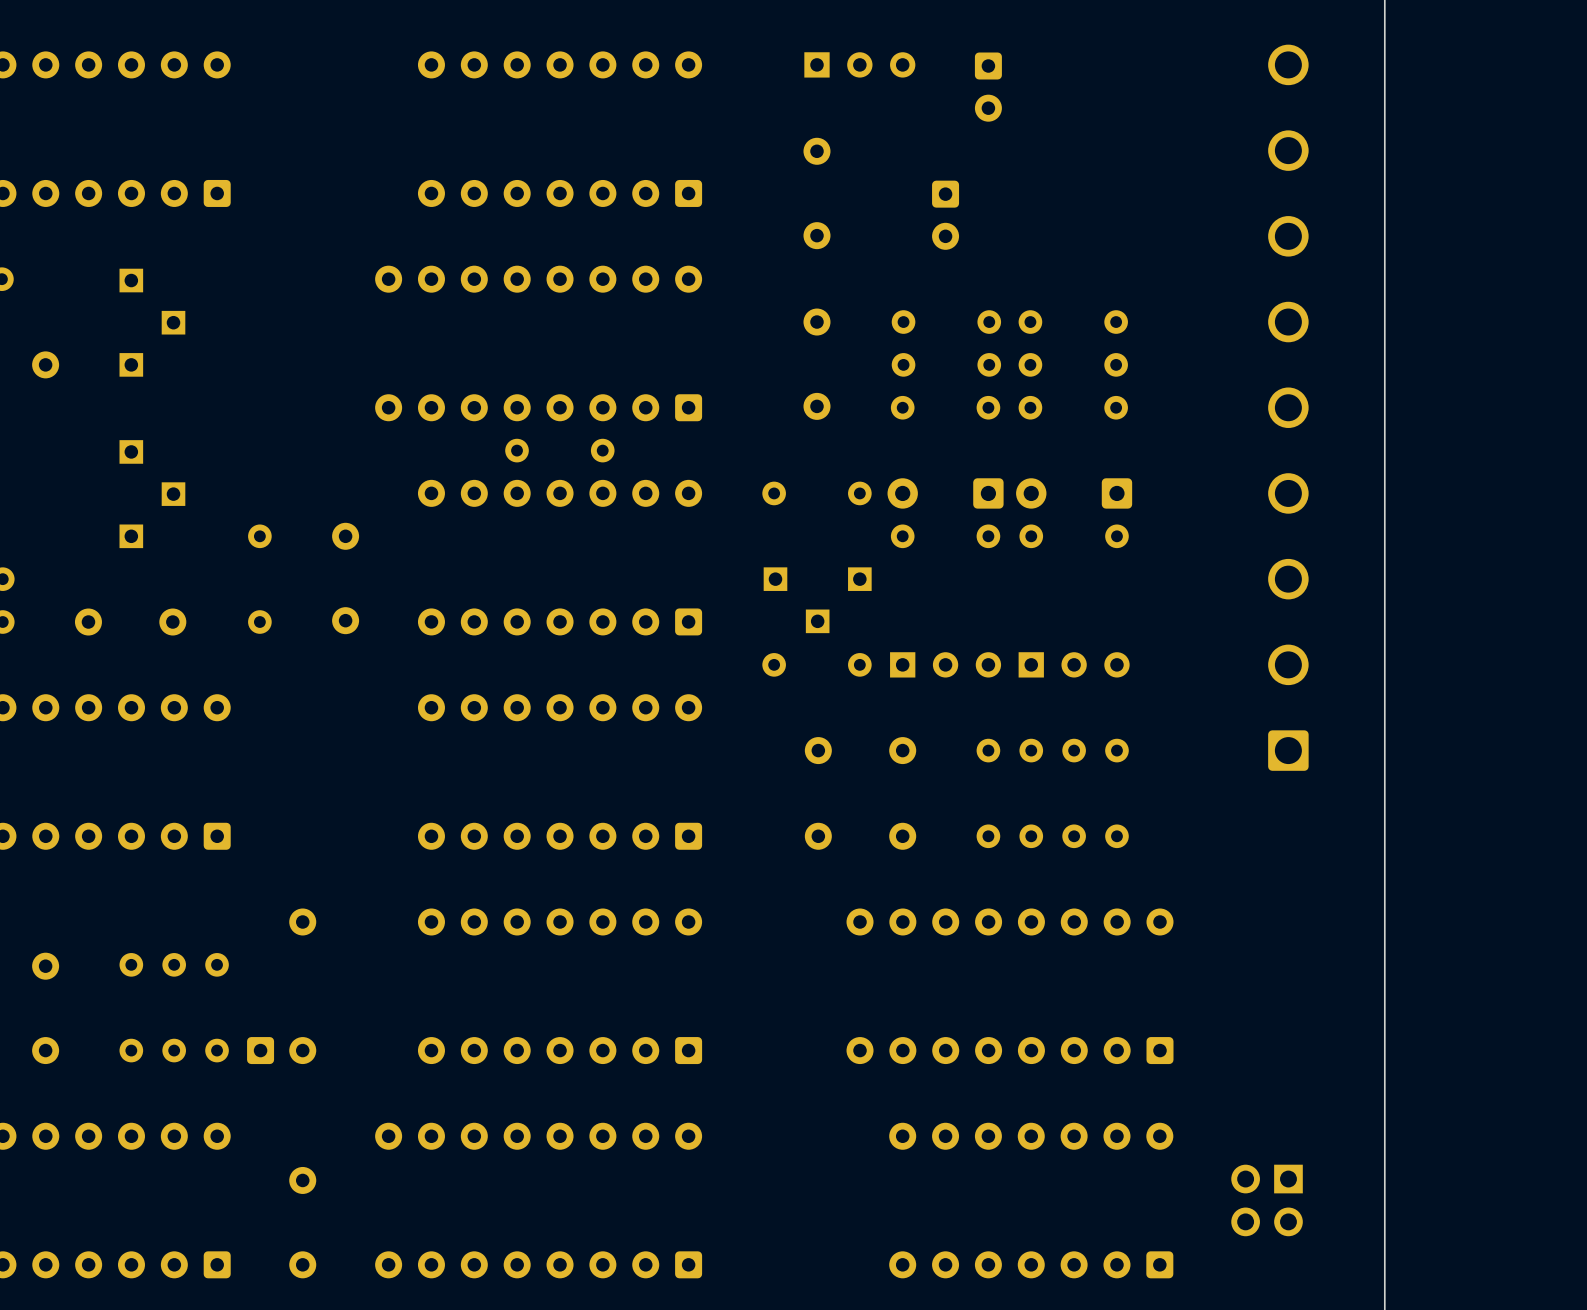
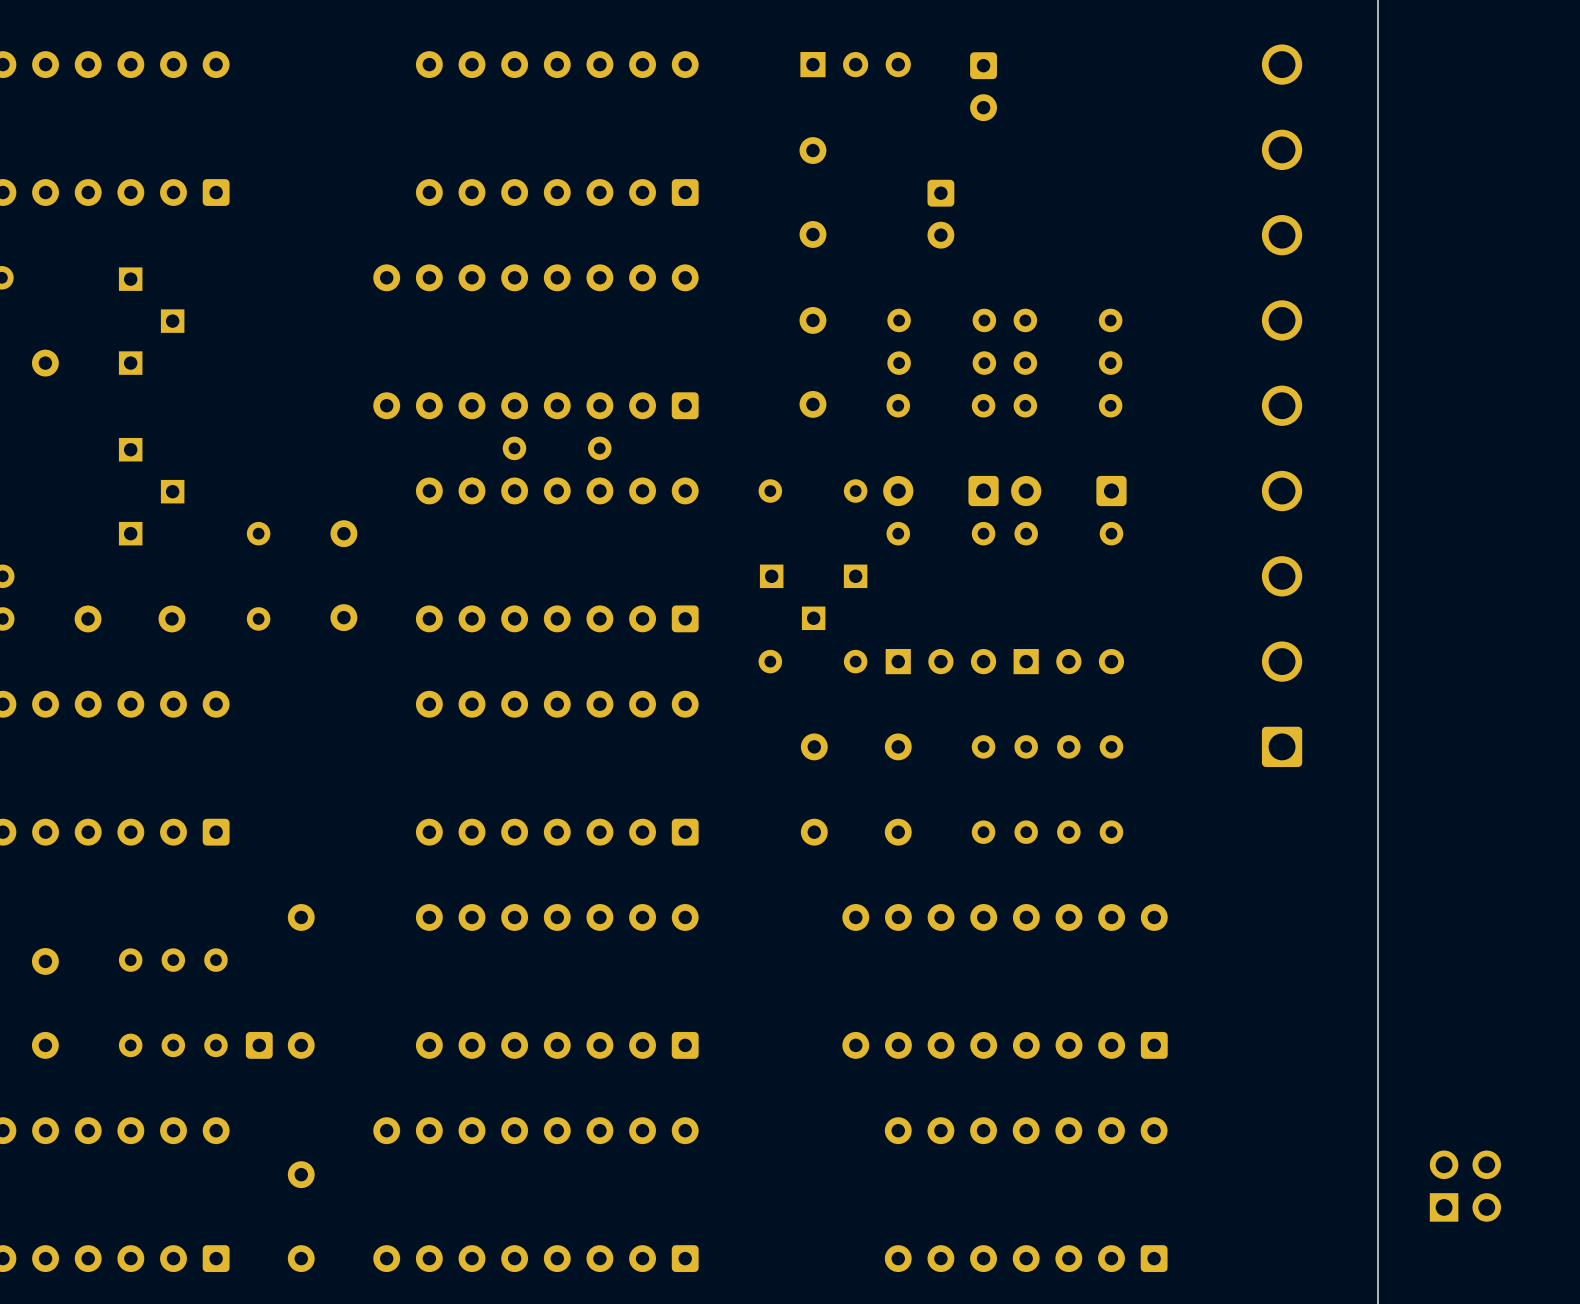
part rotation: 0° (1267, 1200) -> 180° (1465, 1186)
part position: (1267, 1200) -> (1465, 1186)

